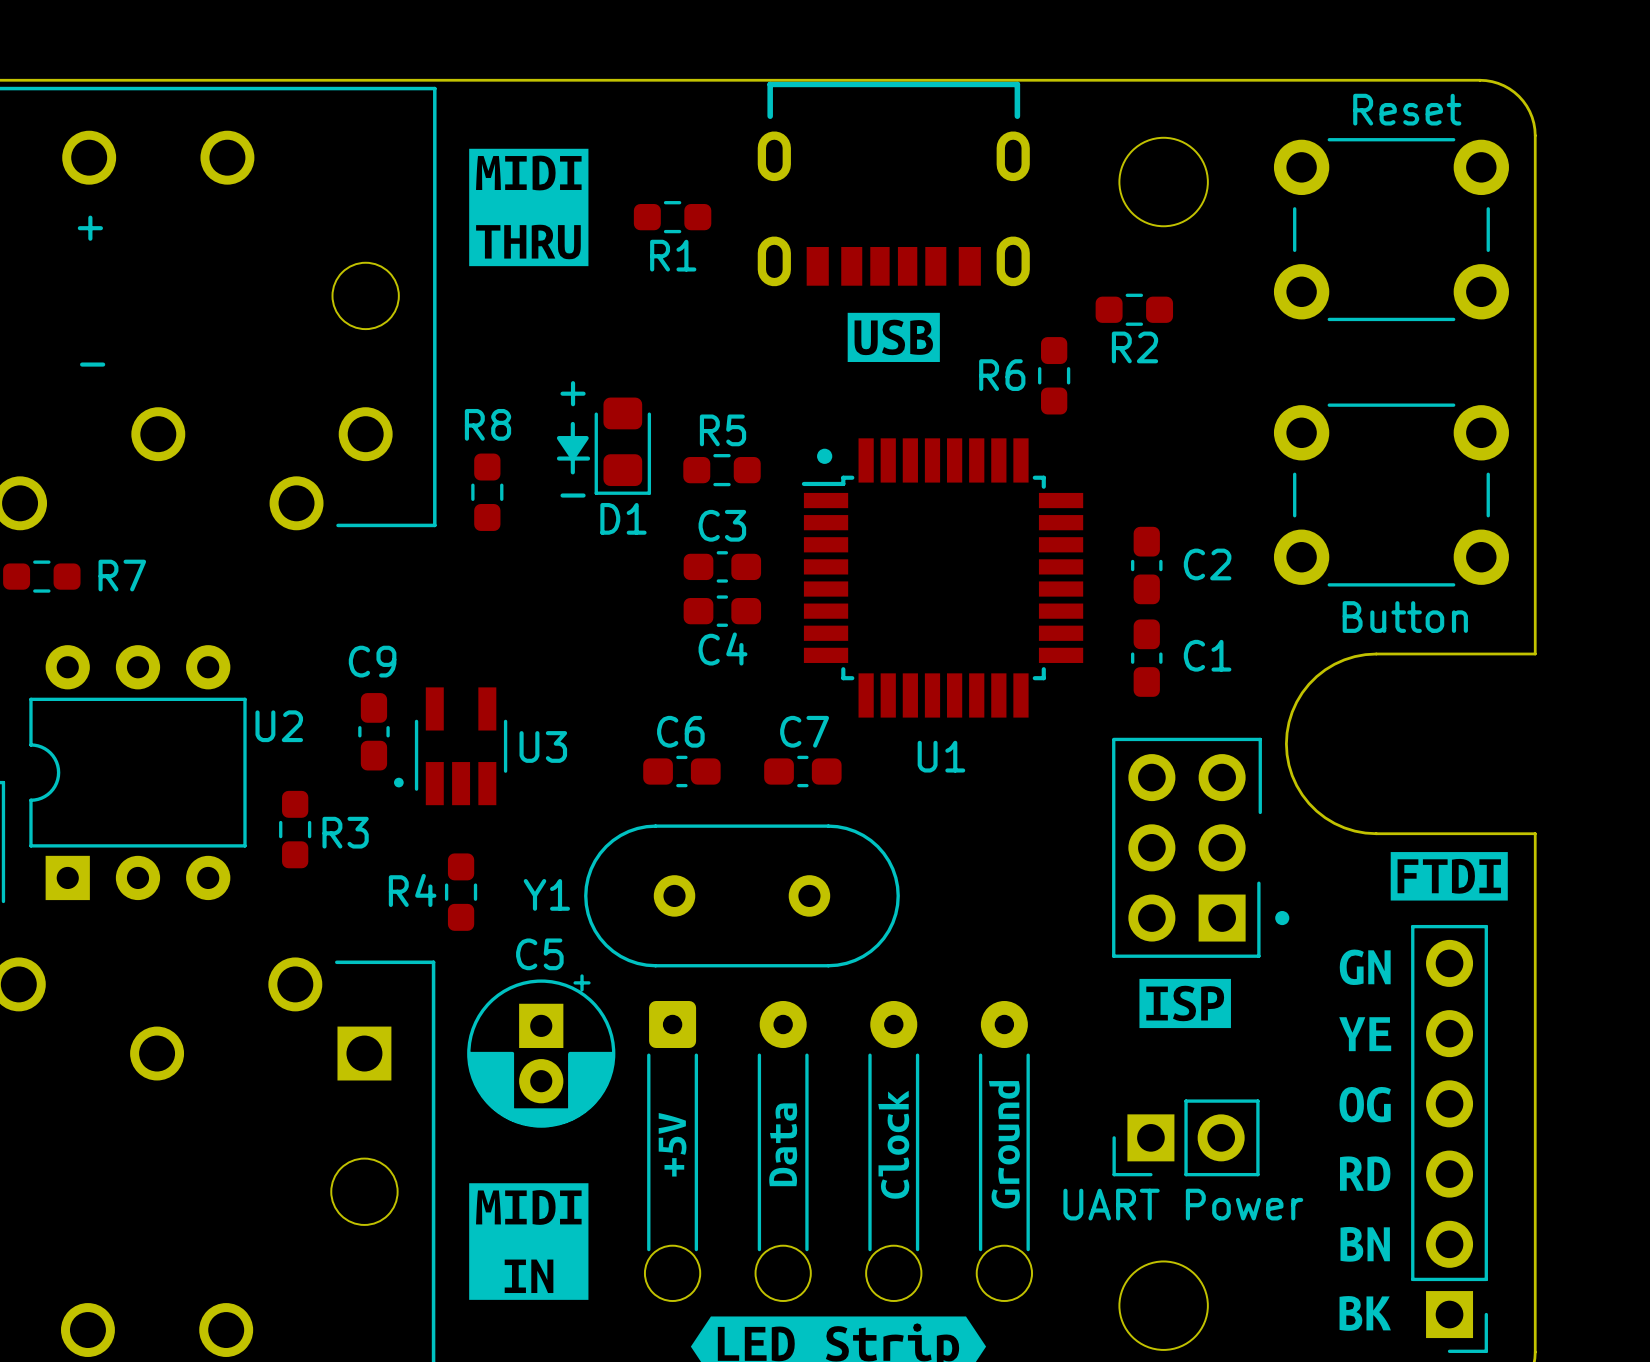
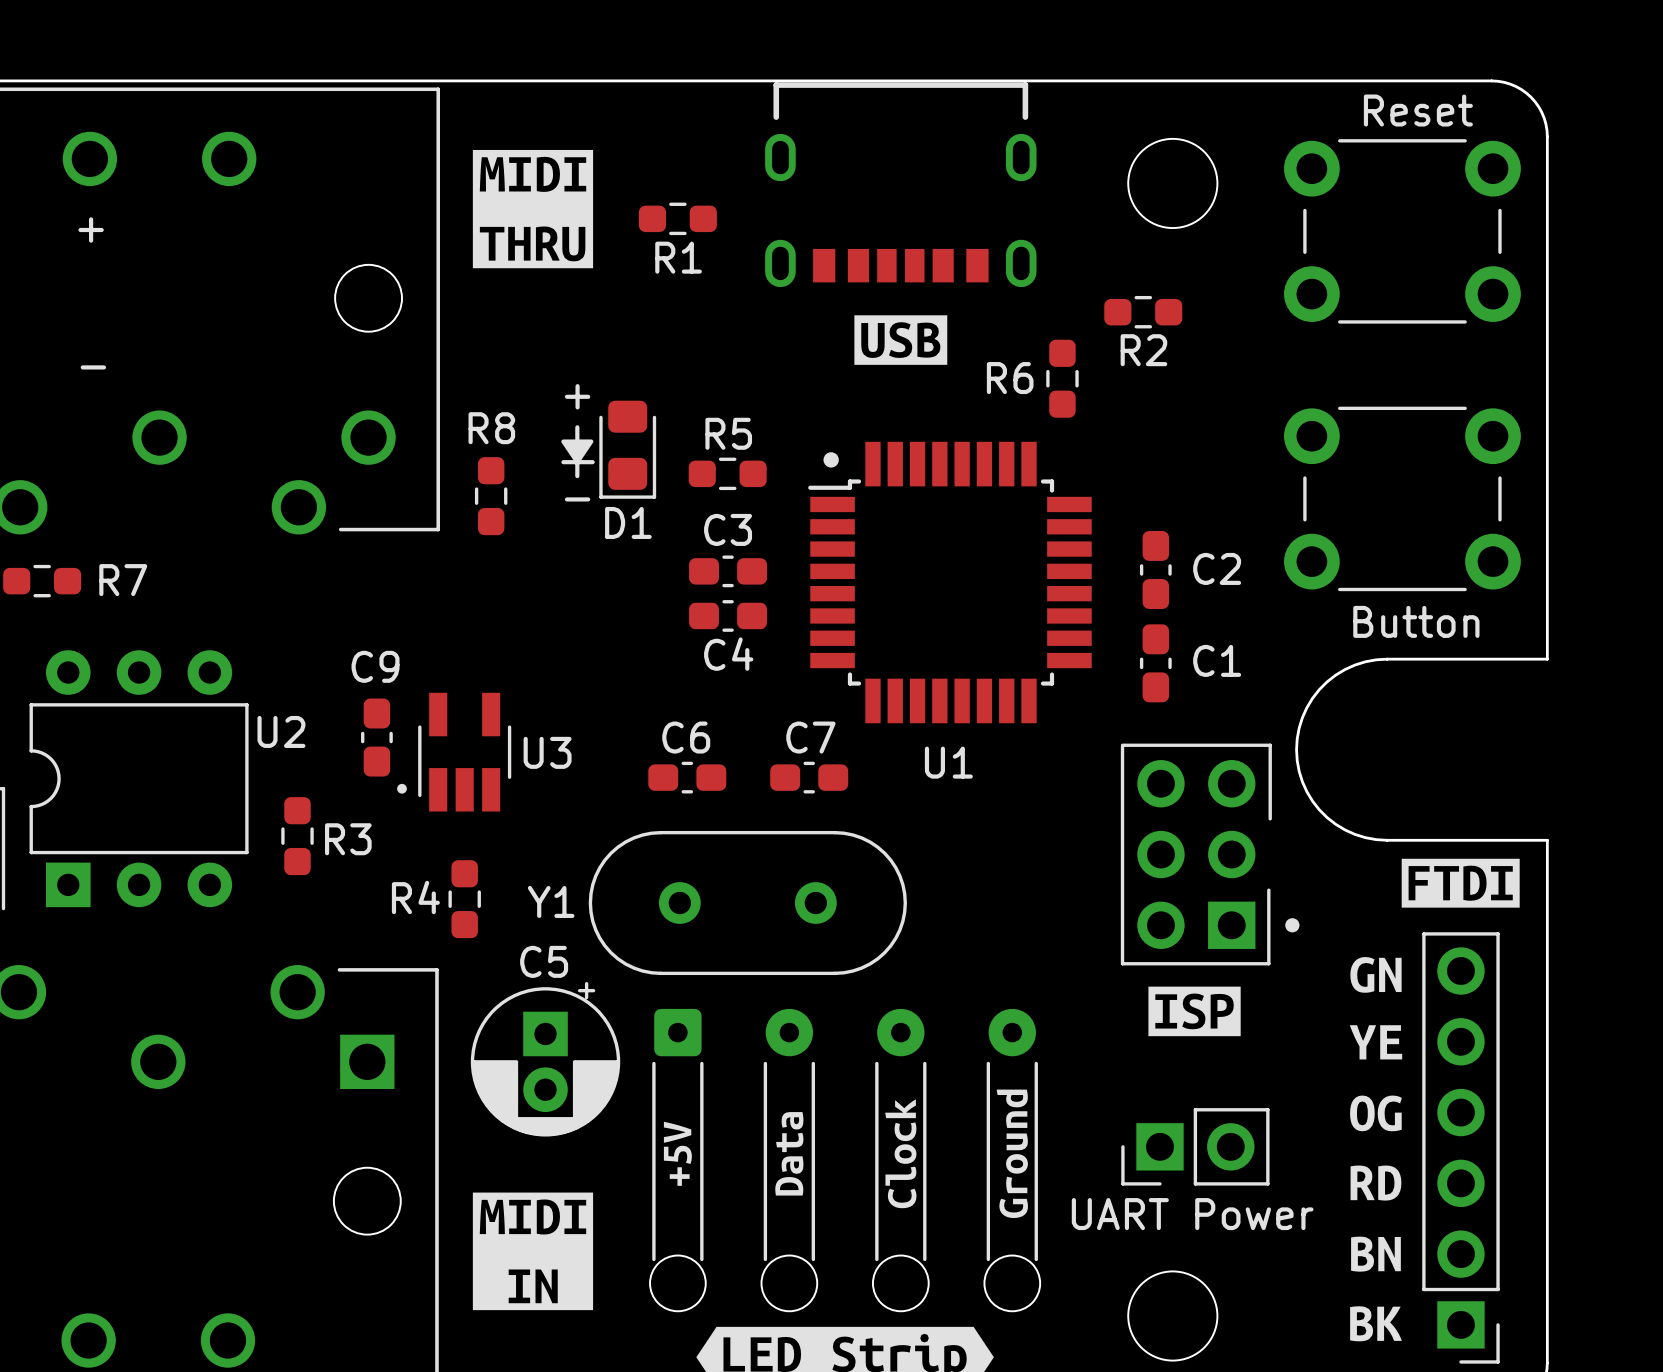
part footprint: [757, 81, 1030, 287] -> [765, 82, 1037, 288]

